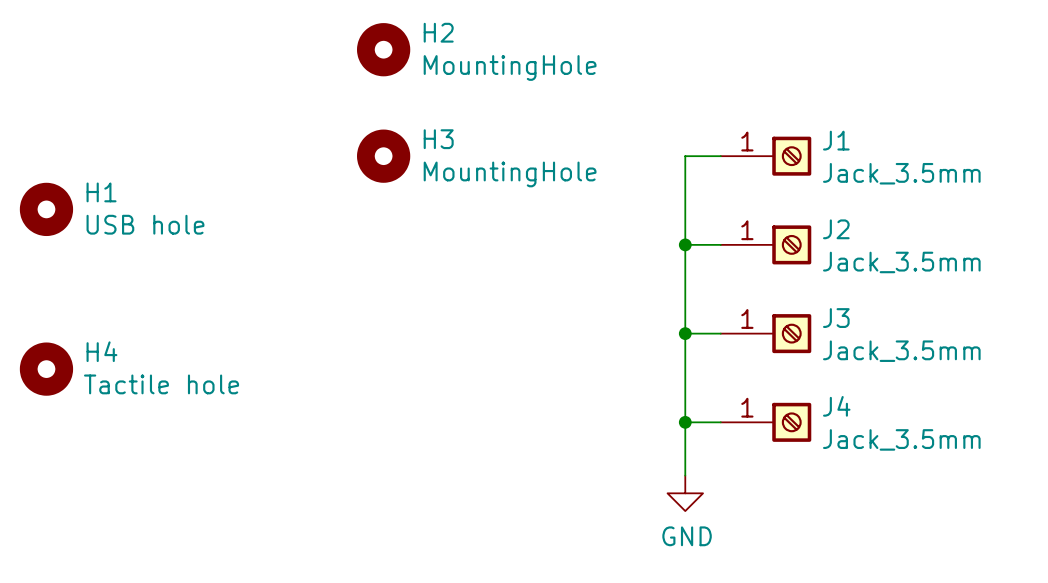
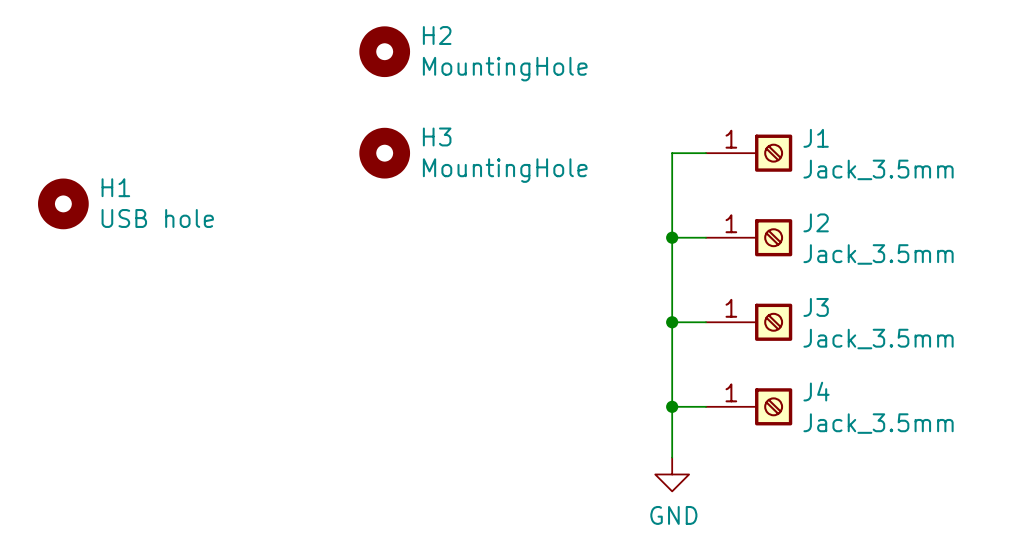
H4: Tactile hole (46, 369) -> none

